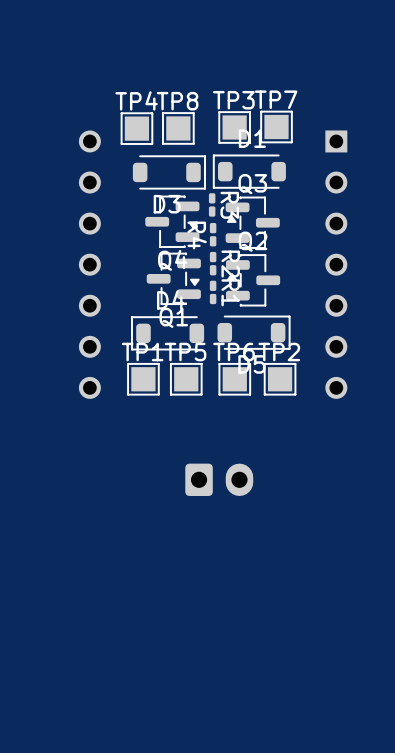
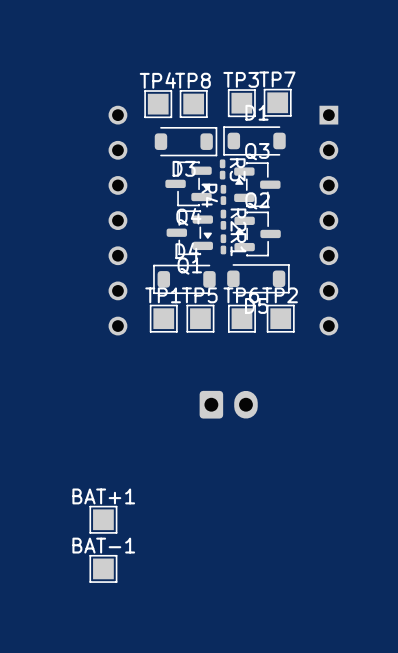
BAT+1: none -> (103, 519)
BAT-1: none -> (103, 568)

